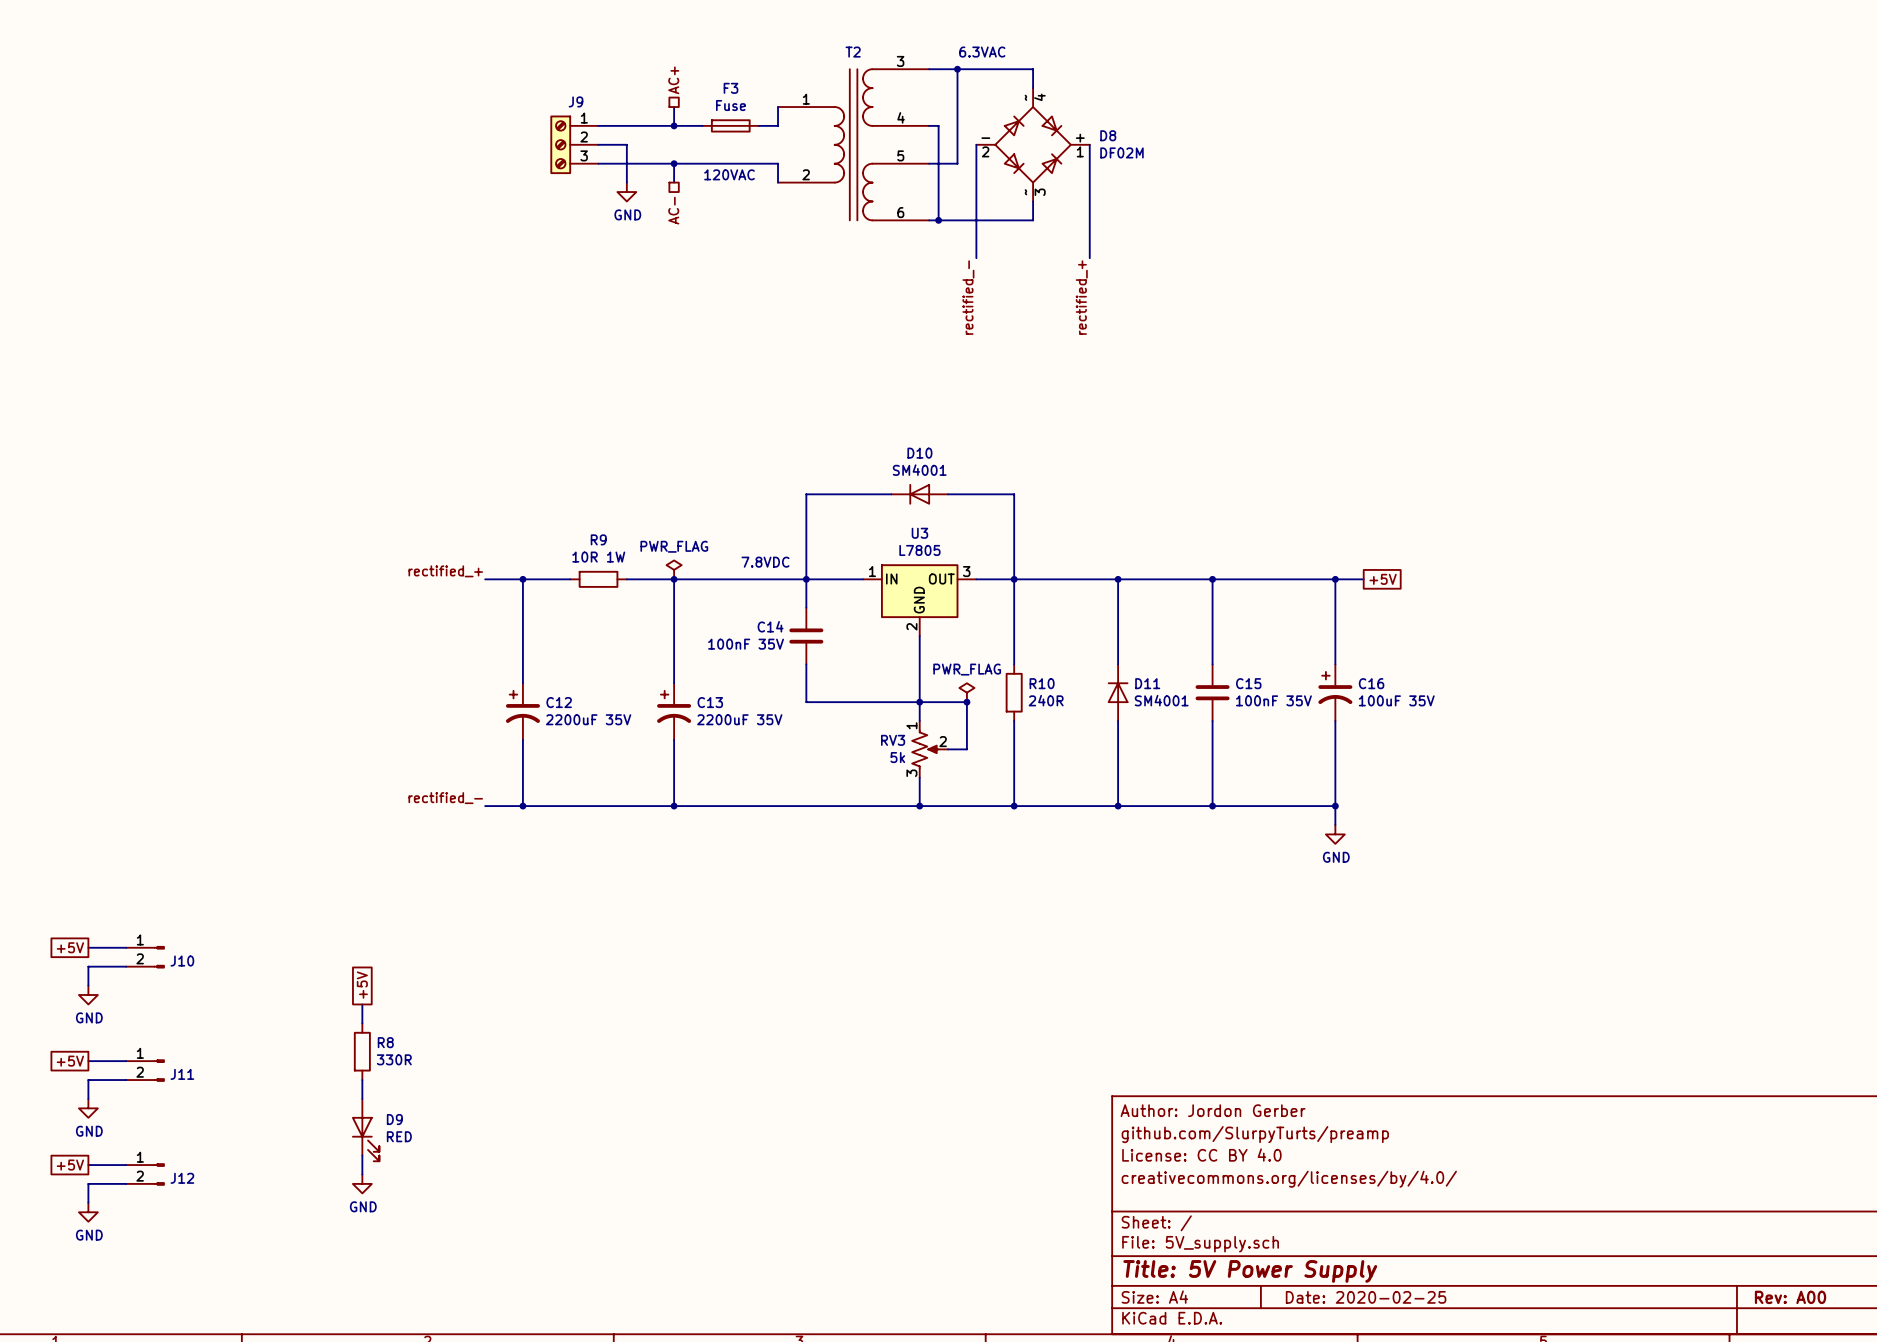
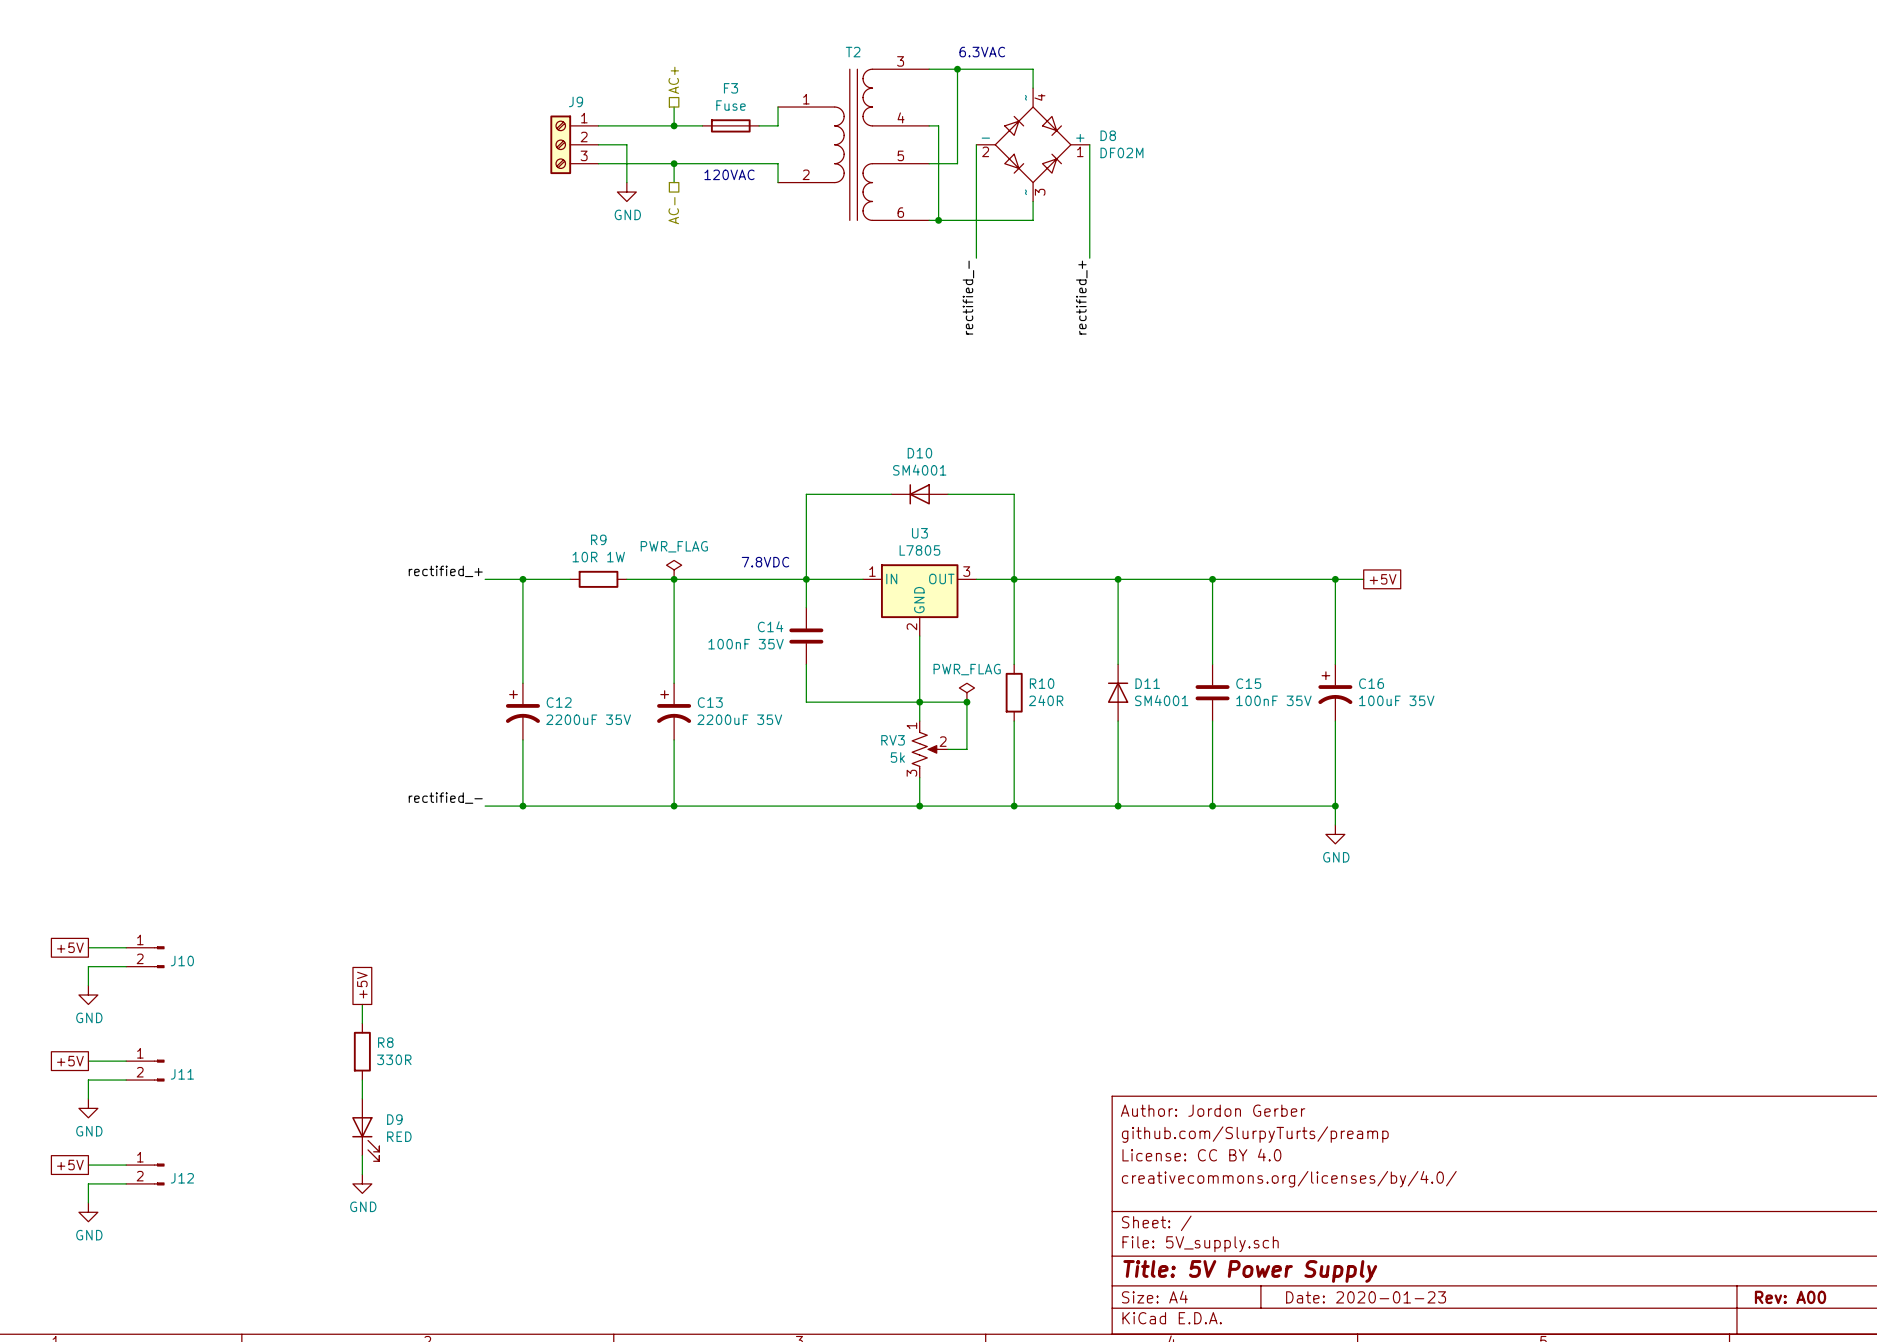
title block: Date: 2020-02-25 (1366, 1297) -> Date: 2020-01-23 (1366, 1297)

